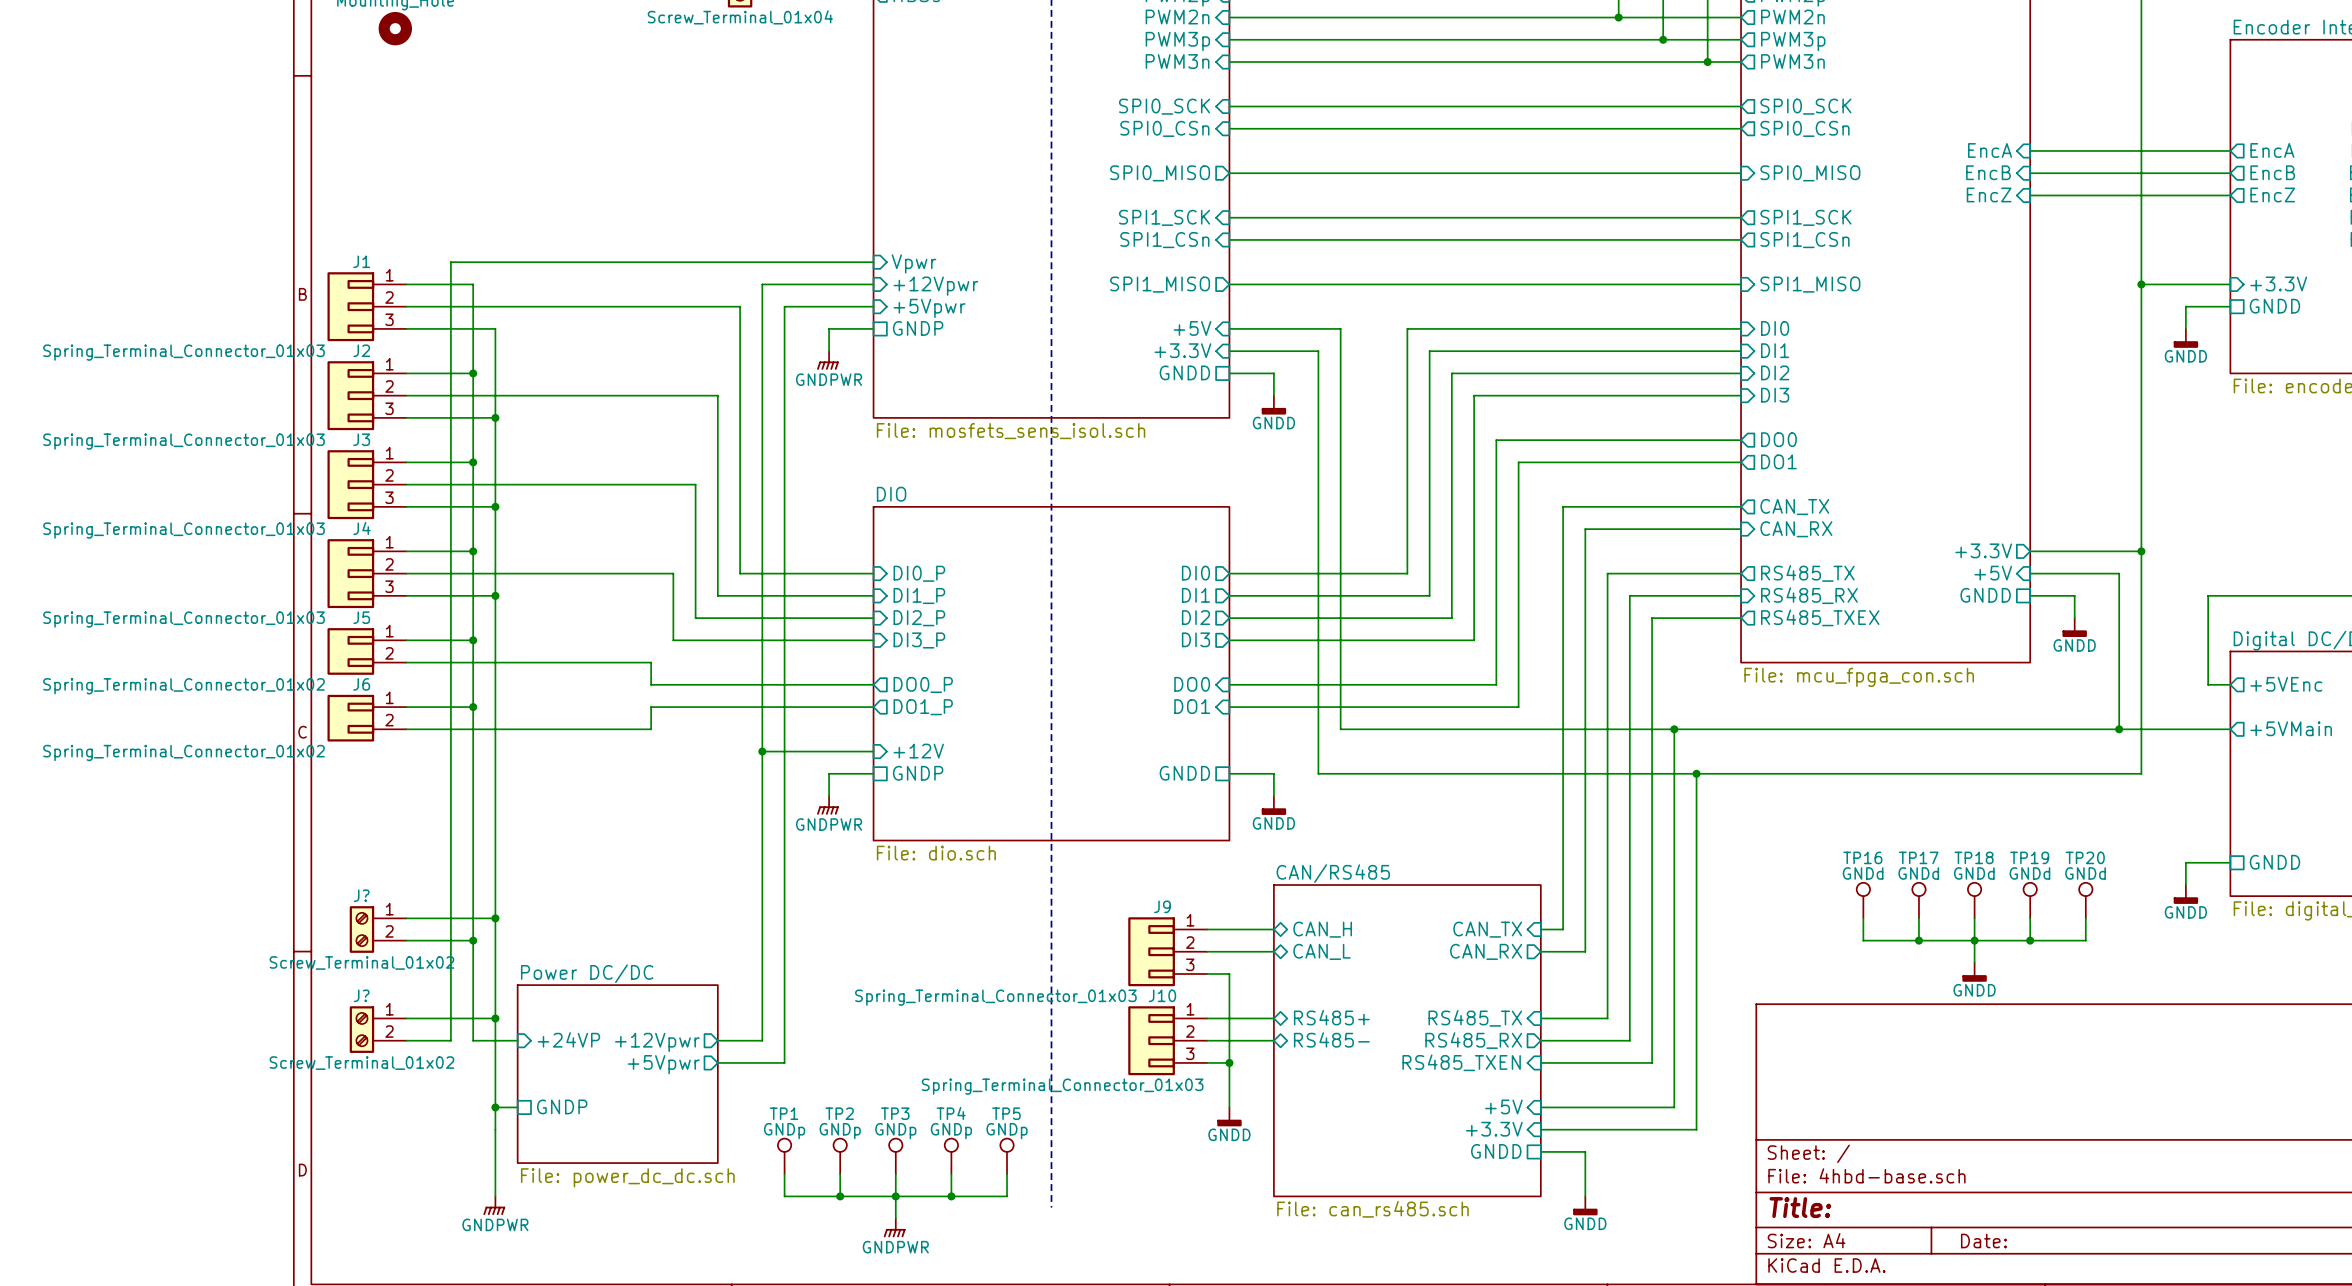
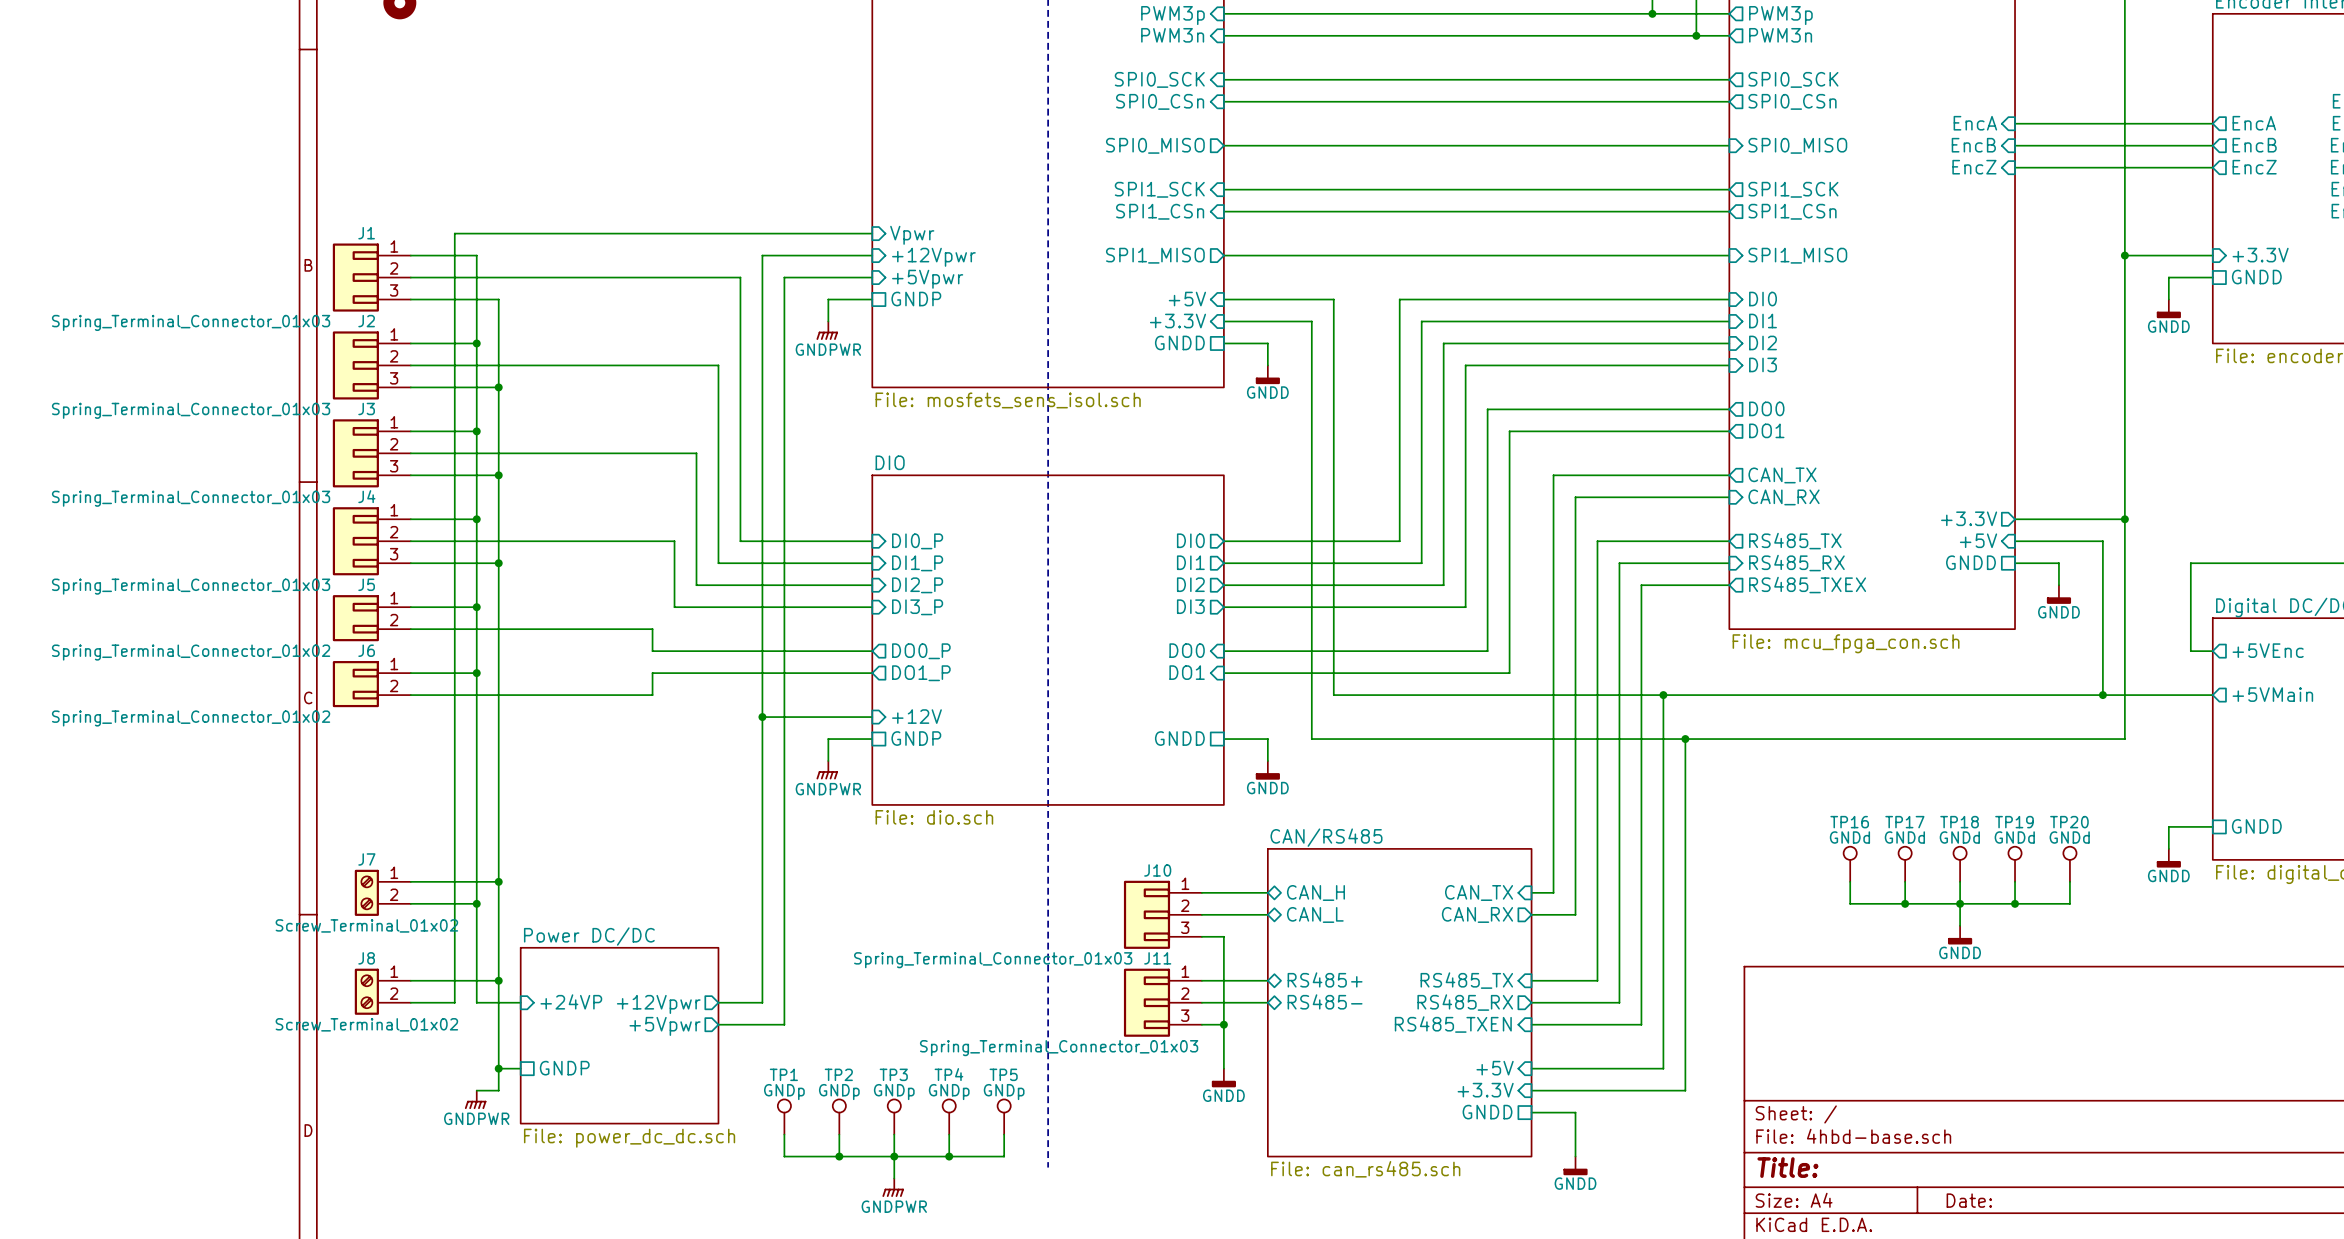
J? name: J? (361, 895) -> J7 (366, 859)
J9 name: J9 (1162, 906) -> J10 (1157, 870)
J? name: J? (361, 995) -> J8 (366, 958)
J10 name: J10 (1162, 995) -> J11 (1157, 958)
wire: (495, 1129) (495, 1196) -> (498, 1090) (476, 1090)
power symbol position: GNDPWR (494, 1205) -> GNDPWR (475, 1099)

